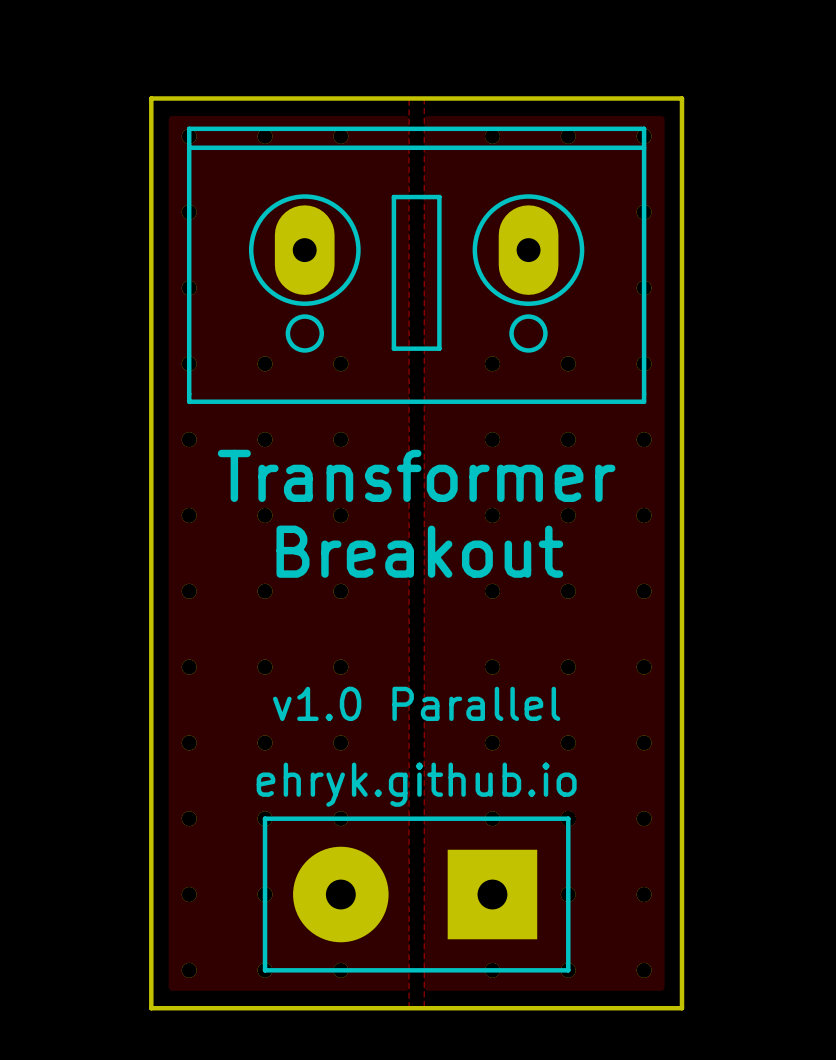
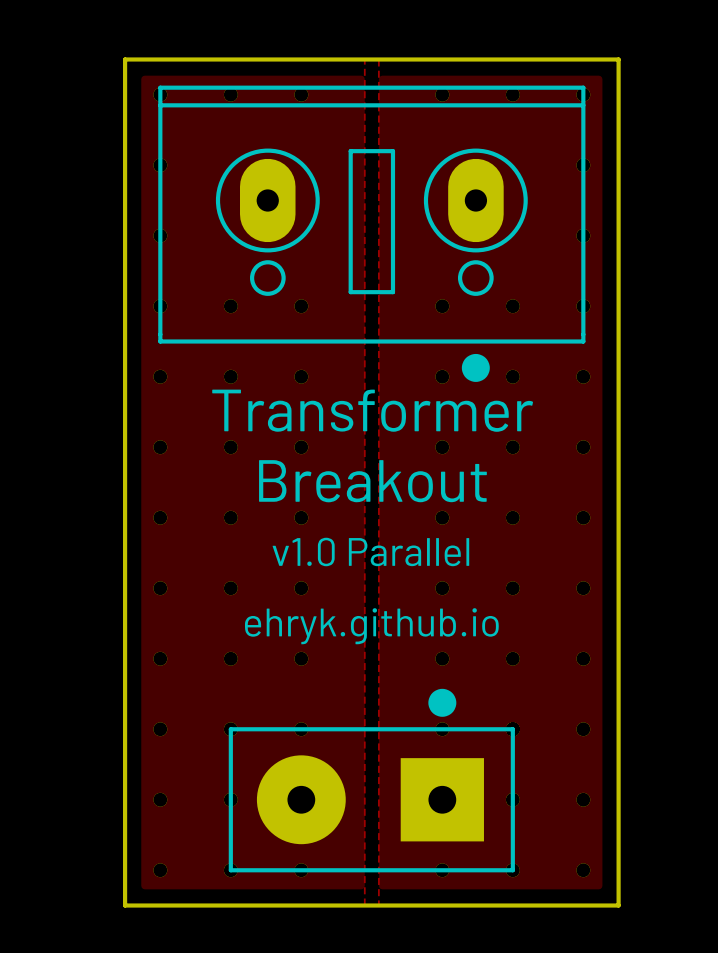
drawing: none -> [461, 353, 490, 382]
text: none -> v1.0 Parallel (370, 551)
text: v1.0 Parallel (416, 703) -> ehryk.github.io (371, 626)
drawing: none -> [428, 688, 457, 717]
text: ehryk.github.io (416, 784) -> none

